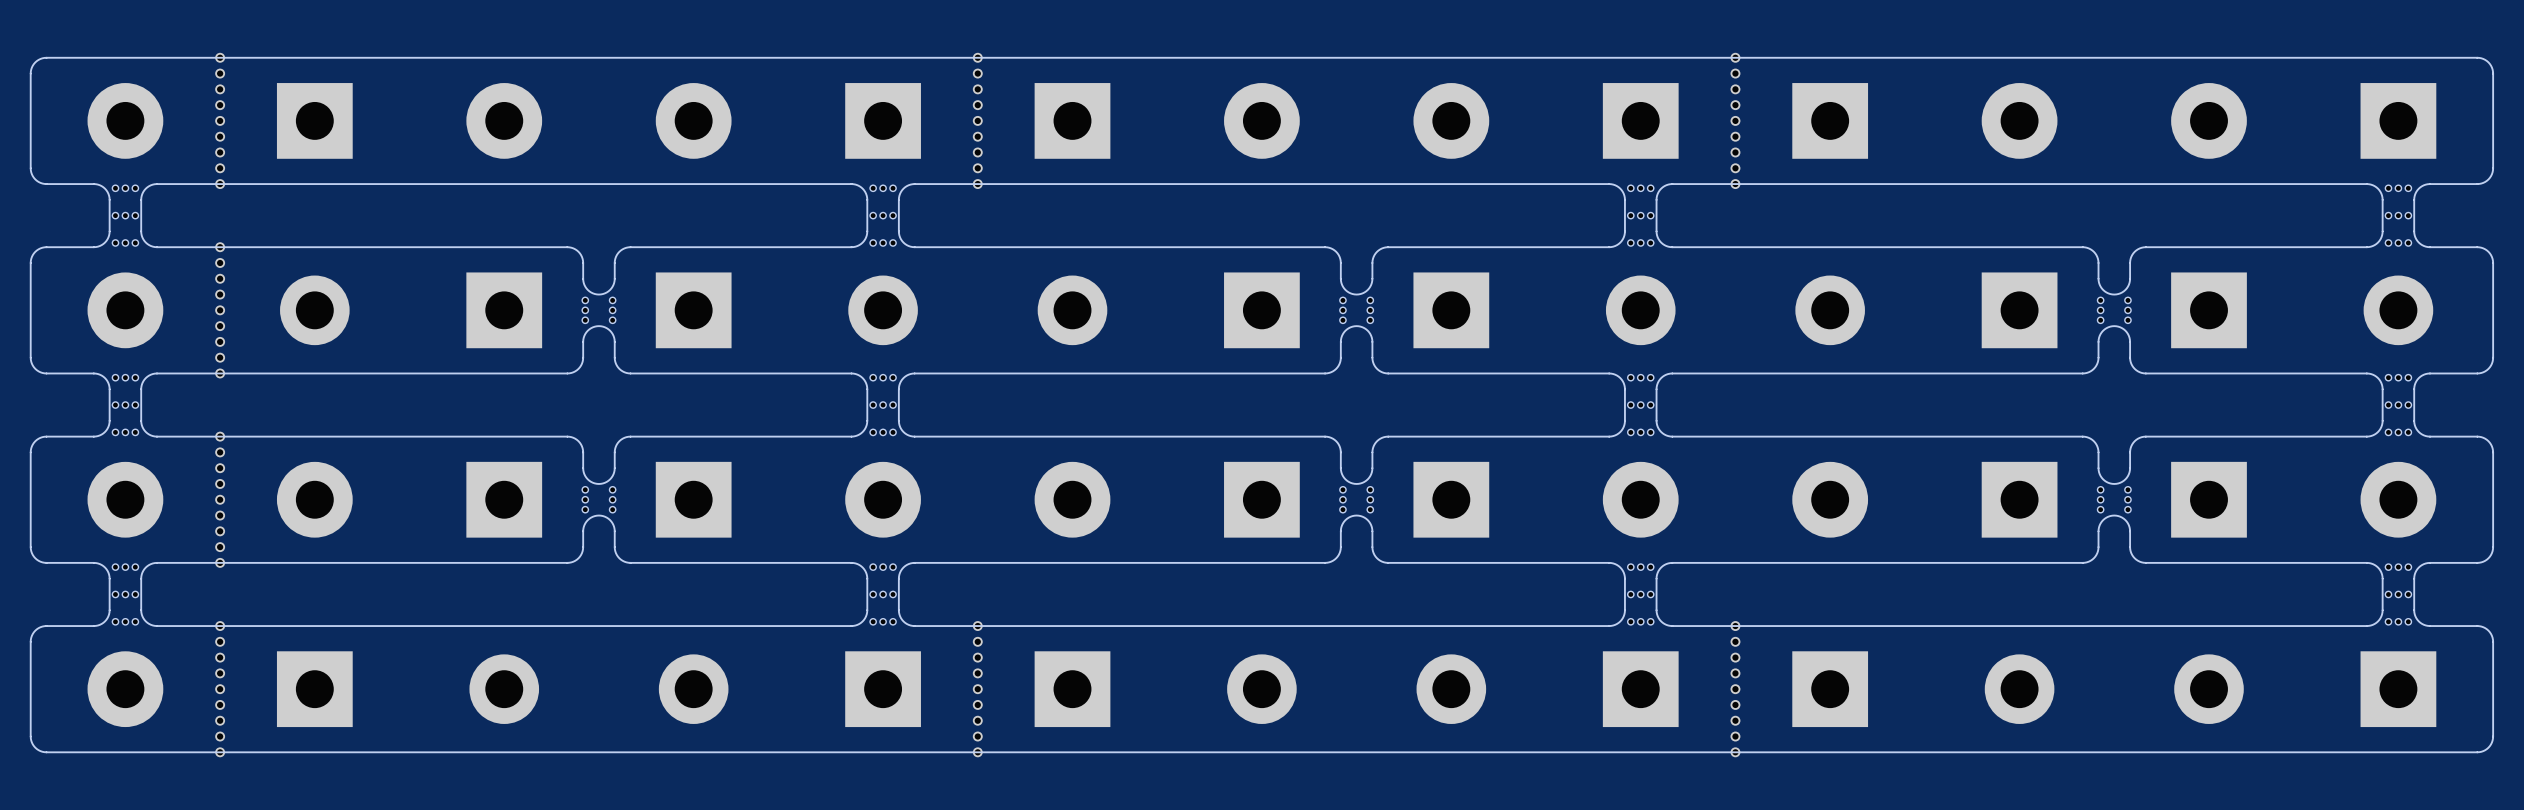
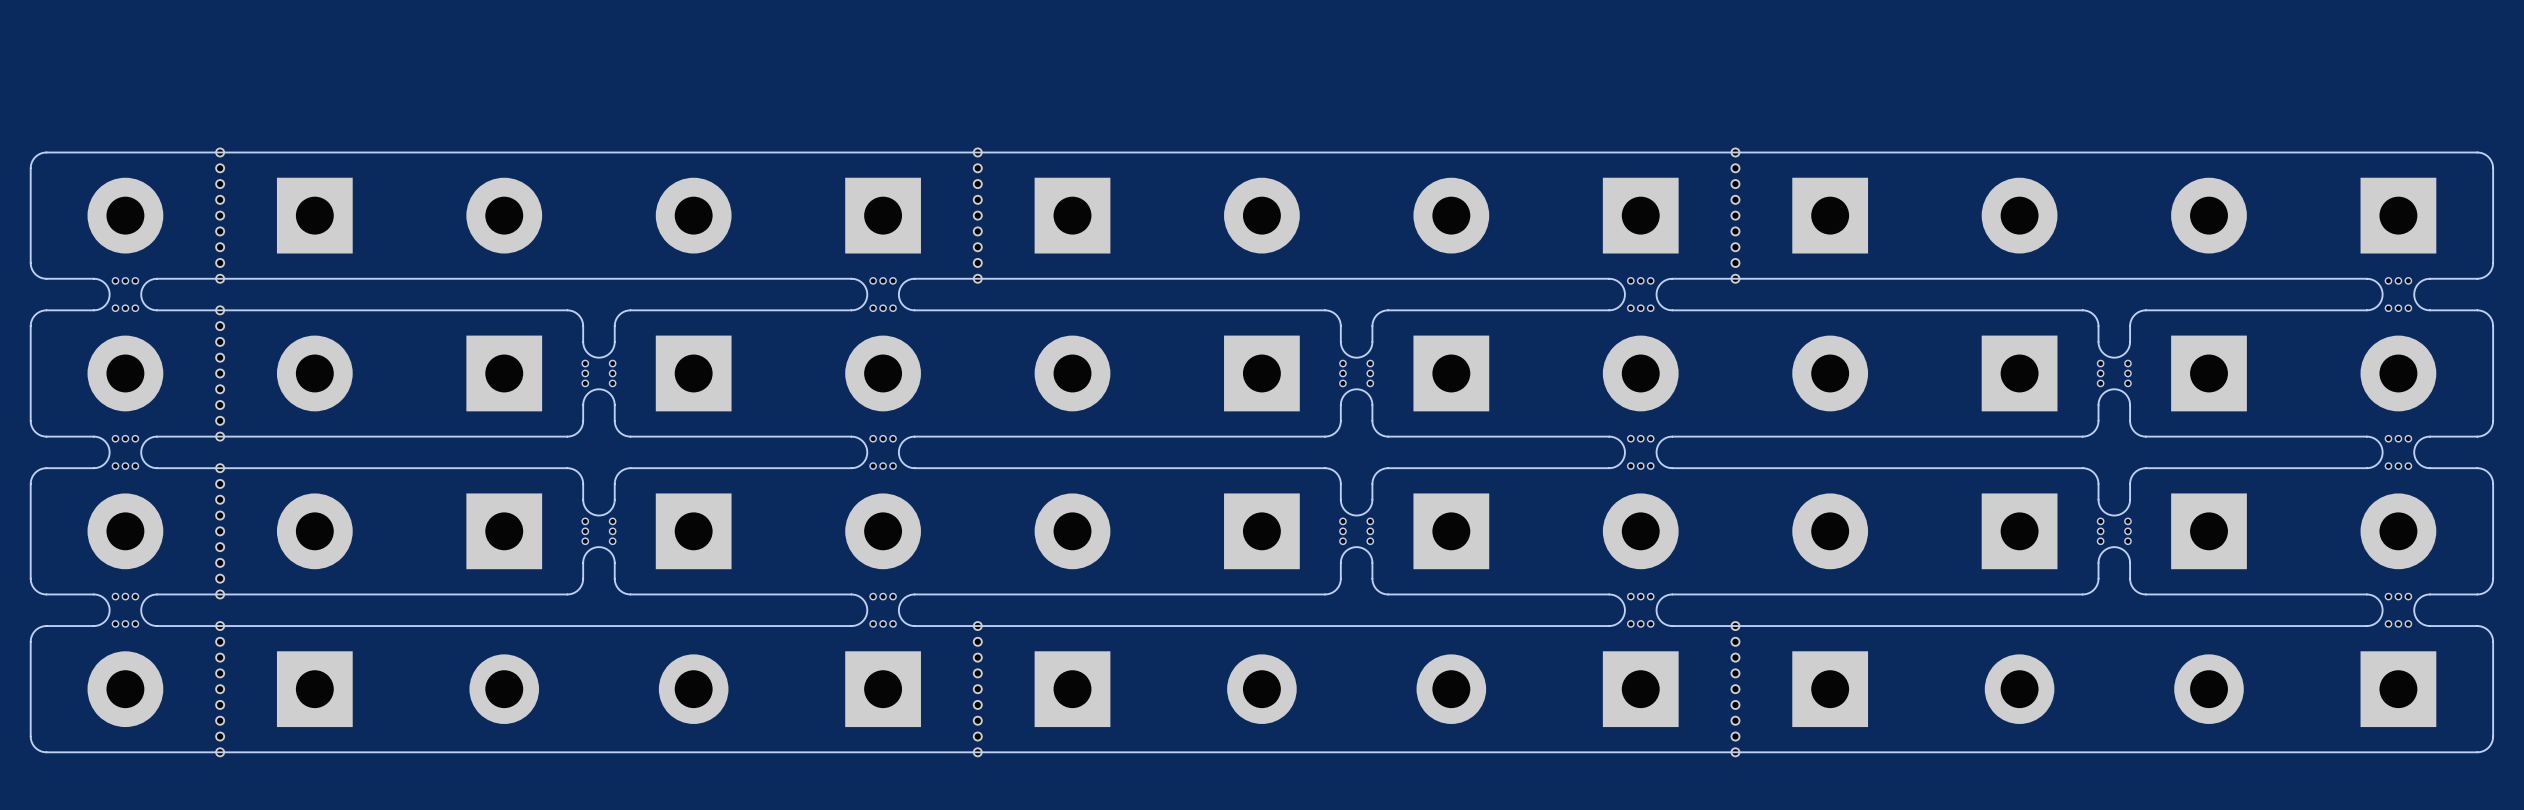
part: (220, 57) -> none
part: (977, 57) -> none
part: (1735, 57) -> none
part: (220, 73) -> none
part: (977, 73) -> none
part: (1735, 73) -> none
part: (220, 89) -> none
part: (977, 89) -> none
part: (1735, 89) -> none
part: (220, 105) -> none
part: (977, 105) -> none
part: (1735, 105) -> none
part: (125, 120) -> none
part: (220, 120) -> none
part position: (314, 120) -> (314, 215)
part position: (504, 120) -> (504, 215)
part position: (693, 120) -> (693, 215)
part: (883, 120) -> none
part: (977, 120) -> none
part position: (1072, 120) -> (1072, 215)
part position: (1261, 120) -> (1261, 215)
part position: (1451, 120) -> (1451, 215)
part: (1640, 120) -> none
part: (1735, 120) -> none
part position: (1830, 120) -> (1830, 215)
part position: (2019, 120) -> (2019, 215)
part position: (2209, 120) -> (2209, 215)
part: (2398, 120) -> none
part: (220, 136) -> none
part: (977, 136) -> none
part: (1735, 136) -> none
board edge: (851, 184) (154, 184) (145, 188) (141, 195) (141, 233) (147, 243) (156, 247) (569, 247) (577, 250) (581, 256) (583, 280) (586, 288) (592, 293) (601, 294) (608, 291) (612, 286) (615, 256) (620, 250) (628, 247) (857, 245) (862, 242) (866, 235) (867, 197) (861, 187) (851, 184) -> none
board edge: (1609, 184) (912, 184) (903, 188) (899, 195) (899, 233) (905, 243) (914, 247) (1327, 247) (1334, 250) (1339, 256) (1340, 280) (1344, 288) (1350, 293) (1358, 294) (1364, 292) (1370, 286) (1373, 256) (1378, 250) (1386, 247) (1615, 245) (1621, 241) (1624, 235) (1624, 197) (1620, 188) (1609, 184) -> none
board edge: (2366, 184) (1670, 184) (1661, 188) (1657, 195) (1656, 233) (1661, 242) (1672, 247) (2084, 247) (2092, 250) (2097, 256) (2098, 280) (2101, 288) (2108, 293) (2116, 294) (2123, 291) (2128, 284) (2132, 255) (2136, 250) (2143, 247) (2372, 245) (2378, 242) (2382, 235) (2382, 197) (2378, 188) (2366, 184) -> none
part footprint: [112, 185, 139, 247] -> [87, 177, 164, 254]
part footprint: [870, 185, 897, 247] -> [845, 177, 921, 254]
part footprint: [1627, 185, 1654, 247] -> [1602, 177, 1679, 254]
part footprint: [2385, 185, 2412, 247] -> [2360, 177, 2437, 254]
part: none -> (220, 199)
part: none -> (977, 199)
part: none -> (1735, 199)
part: none -> (220, 215)
part: none -> (977, 215)
part: none -> (1735, 215)
part: none -> (220, 231)
part: none -> (977, 231)
part: none -> (1735, 231)
part: none -> (977, 247)
part: none -> (1735, 247)
part: none -> (977, 262)
part: none -> (1735, 262)
board edge: none -> (851, 278) (156, 278) (145, 283) (141, 294) (145, 305) (156, 310) (569, 310) (577, 313) (581, 320) (585, 349) (591, 355) (598, 357) (606, 355) (612, 349) (615, 320) (619, 314) (626, 310) (853, 310) (862, 305) (867, 294) (862, 283) (851, 278)
part: none -> (977, 278)
board edge: none -> (1609, 278) (914, 278) (903, 283) (898, 294) (903, 305) (914, 310) (1327, 310) (1334, 313) (1339, 320) (1342, 349) (1348, 355) (1356, 357) (1364, 355) (1370, 349) (1373, 320) (1377, 314) (1384, 310) (1611, 310) (1621, 304) (1624, 292) (1618, 282) (1609, 278)
part: none -> (1735, 278)
board edge: none -> (2366, 278) (1672, 278) (1661, 283) (1656, 294) (1661, 305) (1672, 310) (2084, 310) (2092, 313) (2097, 320) (2100, 349) (2106, 355) (2114, 357) (2122, 355) (2127, 349) (2131, 320) (2134, 314) (2141, 310) (2368, 310) (2378, 305) (2382, 294) (2378, 283) (2366, 278)
part: none -> (125, 294)
part: (220, 294) -> none
part: none -> (883, 294)
part: none -> (1640, 294)
part: none -> (2398, 294)
part: (125, 310) -> none
part: (314, 310) -> none
part: (504, 310) -> none
part: (598, 310) -> none
part: (693, 310) -> none
part: (883, 310) -> none
part: (1072, 310) -> none
part: (1261, 310) -> none
part: (1356, 310) -> none
part: (1451, 310) -> none
part: (1640, 310) -> none
part: (1830, 310) -> none
part: (2019, 310) -> none
part: (2114, 310) -> none
part: (2209, 310) -> none
part: (2398, 310) -> none
board edge: (2493, 326) (2493, 262) (2489, 253) (2479, 247) (2425, 246) (2417, 241) (2414, 231) (2414, 197) (2420, 187) (2429, 184) (2479, 183) (2486, 180) (2491, 174) (2492, 71) (2488, 62) (2479, 57) (46, 57) (35, 62) (30, 71) (31, 174) (36, 180) (44, 183) (93, 184) (103, 187) (109, 197) (109, 231) (106, 241) (97, 246) (44, 247) (33, 253) (30, 262) (30, 326) -> (2493, 326) (2489, 316) (2483, 311) (2425, 309) (2418, 305) (2414, 296) (2416, 286) (2423, 279) (2479, 278) (2486, 275) (2491, 269) (2492, 166) (2486, 155) (2477, 152) (44, 152) (35, 157) (30, 166) (31, 269) (36, 275) (44, 278) (99, 279) (107, 286) (109, 296) (105, 305) (97, 309) (40, 311) (32, 318) (30, 326)
board edge: (30, 357) (33, 367) (42, 372) (95, 373) (106, 379) (109, 389) (109, 424) (103, 433) (93, 436) -> (30, 357) (31, 424) (36, 433) (46, 436)
board edge: (2493, 357) (2489, 367) (2481, 372) (2427, 373) (2417, 379) (2414, 389) (2414, 424) (2420, 433) (2429, 436) -> (2493, 357) (2492, 424) (2486, 433) (2477, 436)
part: none -> (125, 373)
part: none -> (314, 373)
part: none -> (504, 373)
part: none -> (598, 373)
part: none -> (693, 373)
part: none -> (883, 373)
part: none -> (1072, 373)
part: none -> (1261, 373)
part: none -> (1356, 373)
part: none -> (1451, 373)
part: none -> (1640, 373)
part: none -> (1830, 373)
part: none -> (2019, 373)
part: none -> (2114, 373)
part: none -> (2209, 373)
part: none -> (2398, 373)
part: none -> (220, 389)
part: (125, 405) -> none
part: none -> (220, 405)
part: (883, 405) -> none
part: (1640, 405) -> none
part: (2398, 405) -> none
part: none -> (220, 420)
board edge: (46, 436) (36, 439) (31, 448) (30, 483) -> (93, 436) (103, 439) (109, 448) (109, 456) (103, 464) (93, 468) (42, 468) (33, 474) (30, 483)
board edge: (630, 436) (620, 439) (615, 446) (612, 476) (606, 481) (598, 483) (591, 481) (585, 476) (581, 446) (575, 438) (567, 436) -> (630, 436) (622, 434) (616, 428) (613, 399) (608, 392) (598, 389) (591, 391) (585, 397) (581, 426) (577, 433) (567, 436)
board edge: (851, 436) (862, 431) (867, 422) (866, 385) (862, 378) (857, 374) (628, 373) (620, 370) (615, 363) (612, 334) (606, 328) (598, 326) (591, 328) (585, 334) (581, 363) (577, 370) (569, 373) (152, 374) (145, 378) (141, 385) (141, 420) (145, 431) (156, 436) -> (851, 436) (862, 441) (867, 450) (864, 462) (853, 468) (626, 468) (619, 472) (615, 477) (612, 507) (606, 513) (598, 515) (591, 513) (585, 507) (581, 477) (577, 471) (569, 468) (154, 468) (145, 463) (141, 452) (145, 441) (156, 436)
board edge: (1388, 436) (1378, 439) (1373, 446) (1370, 476) (1364, 481) (1356, 483) (1348, 481) (1342, 476) (1339, 446) (1332, 438) (1325, 436) -> (1388, 436) (1380, 434) (1374, 428) (1371, 399) (1366, 392) (1356, 389) (1348, 391) (1342, 397) (1339, 426) (1334, 433) (1325, 436)
board edge: (1609, 436) (1620, 431) (1624, 422) (1624, 385) (1621, 379) (1615, 374) (1386, 373) (1378, 370) (1373, 363) (1370, 334) (1364, 328) (1356, 326) (1348, 328) (1342, 334) (1339, 363) (1334, 370) (1327, 373) (910, 374) (903, 378) (899, 385) (898, 420) (903, 431) (914, 436) -> (1609, 436) (1620, 441) (1624, 452) (1621, 462) (1611, 468) (1384, 468) (1377, 472) (1373, 477) (1370, 507) (1364, 513) (1356, 515) (1348, 513) (1342, 507) (1339, 477) (1334, 471) (1327, 468) (912, 468) (902, 462) (899, 450) (903, 441) (914, 436)
board edge: (2145, 436) (2137, 438) (2132, 444) (2128, 474) (2123, 480) (2114, 483) (2104, 480) (2099, 474) (2096, 444) (2090, 438) (2082, 436) -> (2145, 436) (2137, 434) (2132, 428) (2128, 399) (2123, 392) (2114, 389) (2106, 391) (2100, 397) (2097, 426) (2092, 433) (2082, 436)
board edge: (2366, 436) (2378, 431) (2382, 422) (2382, 385) (2378, 378) (2372, 374) (2143, 373) (2136, 370) (2131, 363) (2127, 334) (2122, 328) (2114, 326) (2106, 328) (2100, 334) (2097, 363) (2092, 370) (2084, 373) (1668, 374) (1661, 378) (1657, 385) (1656, 420) (1661, 431) (1672, 436) -> (2366, 436) (2378, 441) (2382, 452) (2378, 463) (2368, 468) (2141, 468) (2134, 472) (2131, 477) (2127, 507) (2122, 513) (2114, 515) (2106, 513) (2100, 507) (2097, 477) (2092, 471) (2084, 468) (1670, 468) (1659, 462) (1656, 450) (1661, 441) (1672, 436)
board edge: (2477, 436) (2486, 439) (2492, 448) (2493, 483) -> (2429, 436) (2420, 439) (2415, 446) (2414, 456) (2420, 464) (2429, 468) (2481, 468) (2489, 474) (2493, 483)
part: none -> (125, 452)
part: (220, 452) -> none
part: none -> (883, 452)
part: none -> (1640, 452)
part: none -> (2398, 452)
part position: (125, 499) -> (125, 531)
part position: (314, 499) -> (314, 531)
part position: (504, 499) -> (504, 531)
part position: (598, 499) -> (598, 531)
part position: (693, 499) -> (693, 531)
part position: (883, 499) -> (883, 531)
part position: (1072, 499) -> (1072, 531)
part position: (1261, 499) -> (1261, 531)
part position: (1356, 499) -> (1356, 531)
part position: (1451, 499) -> (1451, 531)
part position: (1640, 499) -> (1640, 531)
part position: (1830, 499) -> (1830, 531)
part position: (2019, 499) -> (2019, 531)
part position: (2114, 499) -> (2114, 531)
part position: (2209, 499) -> (2209, 531)
part position: (2398, 499) -> (2398, 531)
board edge: (30, 547) (33, 556) (42, 562) (95, 563) (106, 569) (109, 578) (109, 614) (103, 622) (93, 626) -> (30, 547) (30, 580) (36, 591) (46, 594) (95, 594) (106, 600) (109, 608) (108, 616) (103, 622) (93, 626)
board edge: (2493, 547) (2489, 556) (2481, 562) (2427, 563) (2417, 569) (2414, 578) (2414, 614) (2420, 622) (2429, 626) -> (2493, 547) (2492, 580) (2486, 591) (2477, 594) (2427, 594) (2417, 600) (2414, 608) (2415, 616) (2422, 623) (2429, 626)
part: none -> (220, 578)
part: (125, 594) -> none
part: none -> (220, 594)
part: (883, 594) -> none
part: (1640, 594) -> none
part: (2398, 594) -> none
part: none -> (125, 610)
part: none -> (883, 610)
part: none -> (1640, 610)
part: none -> (2398, 610)
board edge: (851, 626) (861, 622) (867, 612) (866, 574) (862, 567) (857, 564) (628, 562) (620, 559) (615, 553) (612, 523) (606, 517) (598, 515) (591, 517) (585, 523) (581, 553) (577, 559) (569, 562) (152, 563) (145, 567) (141, 574) (141, 610) (145, 621) (156, 626) -> (851, 626) (861, 622) (867, 612) (864, 600) (853, 594) (626, 593) (620, 591) (615, 584) (612, 555) (606, 549) (598, 547) (591, 549) (585, 555) (581, 584) (577, 591) (569, 594) (154, 594) (145, 599) (141, 610) (145, 621) (156, 626)
board edge: (1609, 626) (1618, 622) (1624, 612) (1624, 574) (1621, 569) (1615, 564) (1386, 562) (1378, 559) (1373, 553) (1370, 523) (1364, 517) (1356, 515) (1348, 517) (1342, 523) (1339, 553) (1334, 559) (1327, 562) (910, 563) (903, 567) (899, 574) (898, 610) (903, 621) (914, 626) -> (1609, 626) (1618, 622) (1624, 612) (1621, 600) (1611, 594) (1384, 593) (1378, 591) (1373, 584) (1370, 555) (1364, 549) (1356, 547) (1348, 549) (1342, 555) (1339, 584) (1334, 591) (1327, 594) (912, 594) (902, 600) (899, 612) (903, 621) (914, 626)
board edge: (2366, 626) (2376, 622) (2382, 612) (2382, 574) (2378, 567) (2372, 564) (2143, 562) (2136, 559) (2131, 553) (2127, 523) (2122, 517) (2114, 515) (2106, 517) (2100, 523) (2097, 553) (2092, 559) (2084, 562) (1668, 563) (1661, 567) (1657, 574) (1656, 610) (1661, 621) (1672, 626) -> (2366, 626) (2378, 621) (2382, 610) (2379, 600) (2368, 594) (2141, 593) (2136, 591) (2131, 584) (2127, 555) (2122, 549) (2114, 547) (2106, 549) (2100, 555) (2097, 584) (2092, 591) (2084, 594) (1670, 594) (1659, 600) (1656, 612) (1662, 622) (1672, 626)

